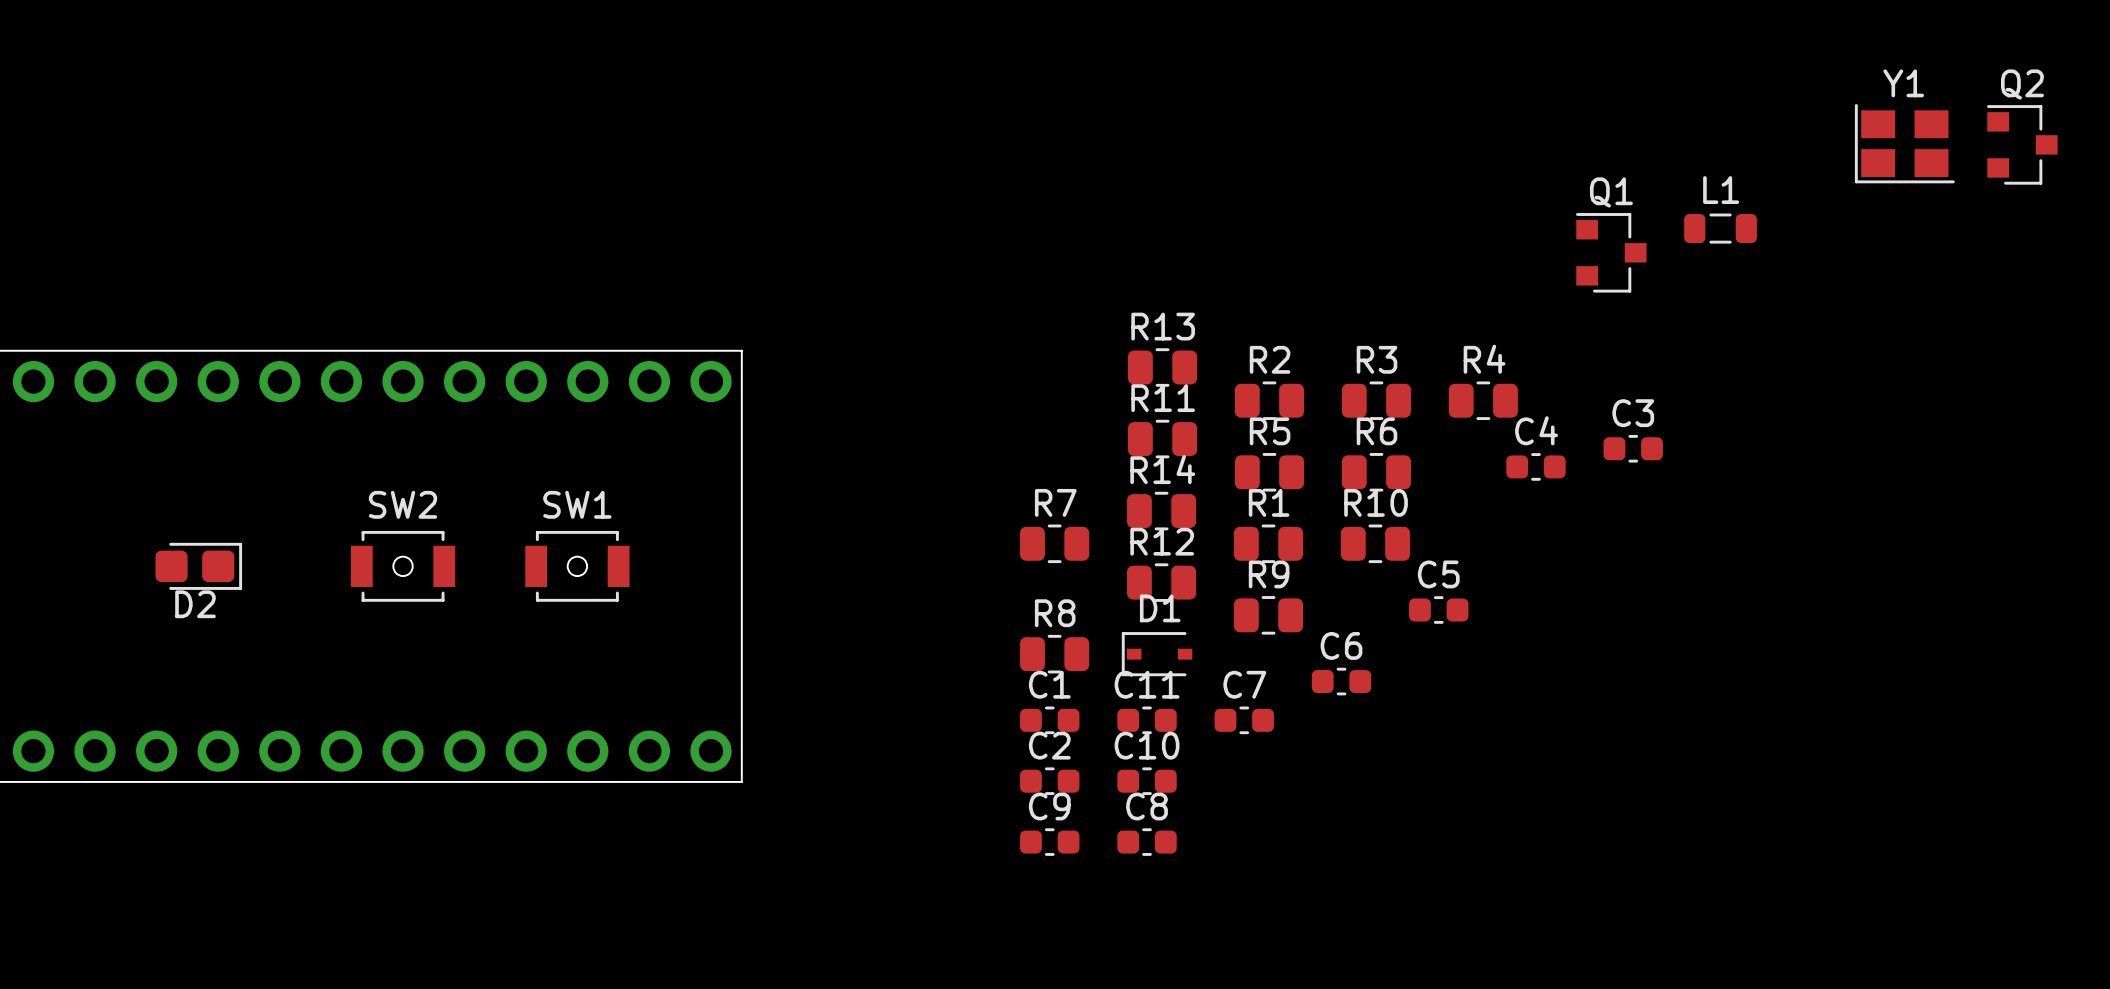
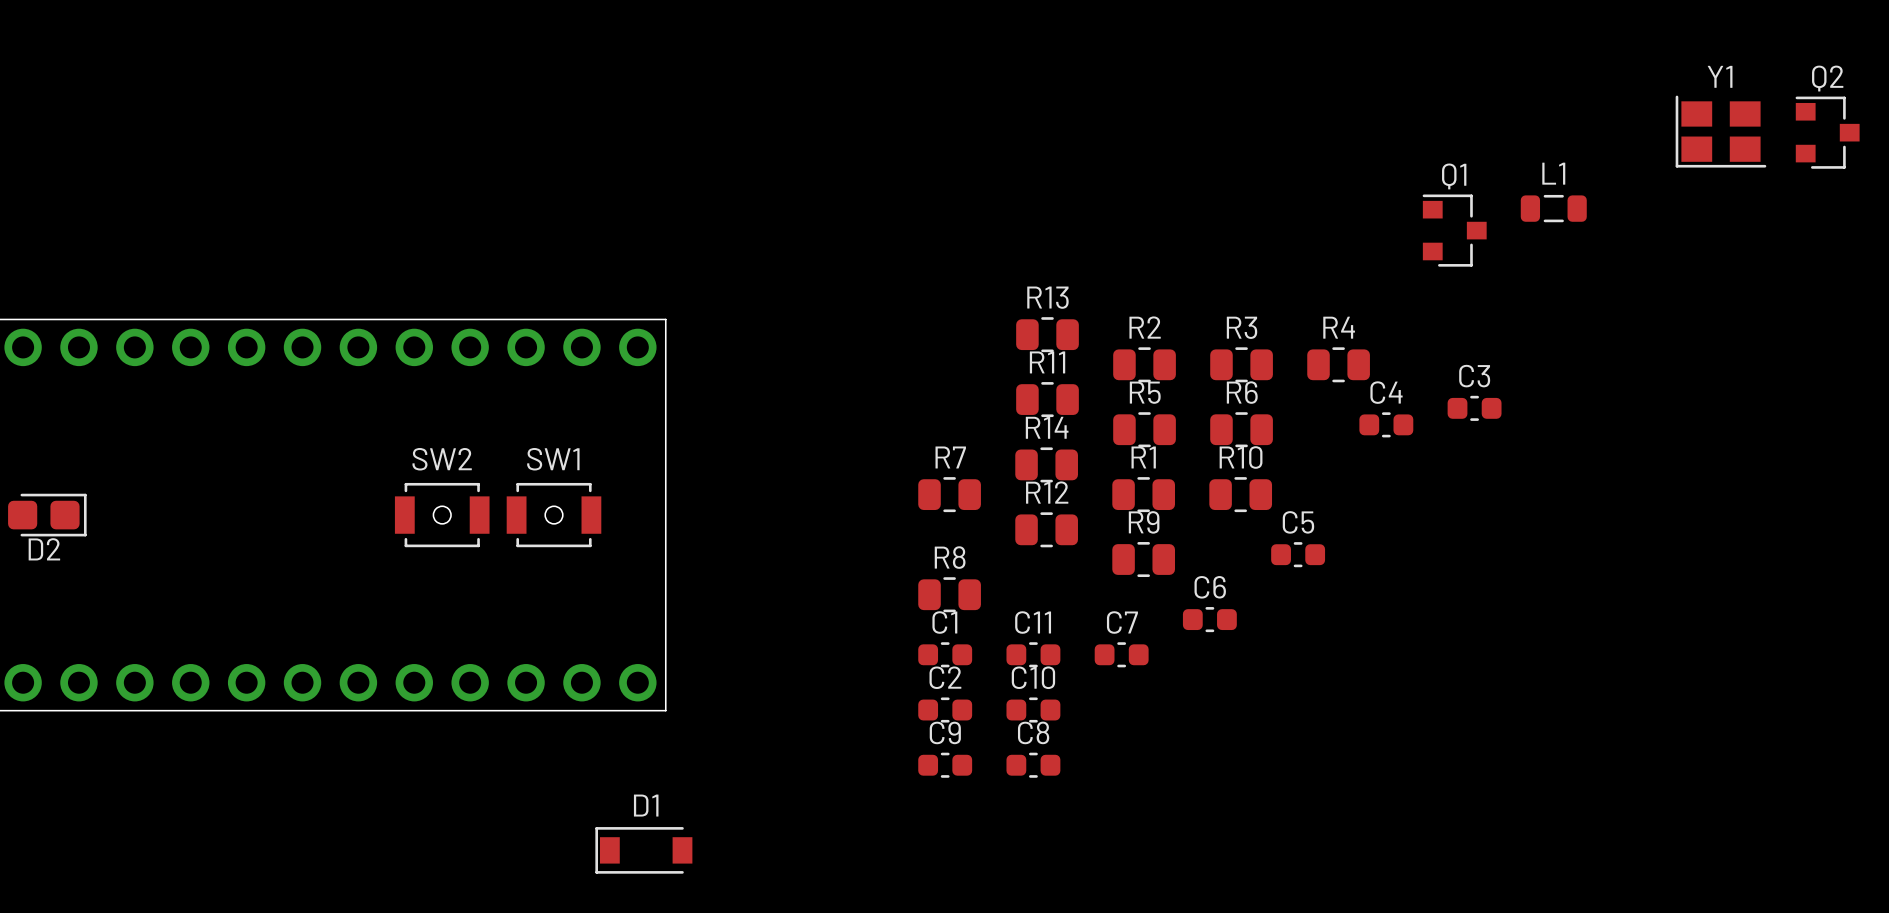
D2 position: (198, 566) -> (47, 515)
SW2 position: (403, 566) -> (442, 515)
SW1 position: (577, 566) -> (554, 515)
D1 footprint: [1121, 632, 1193, 677] -> [595, 827, 693, 874]

